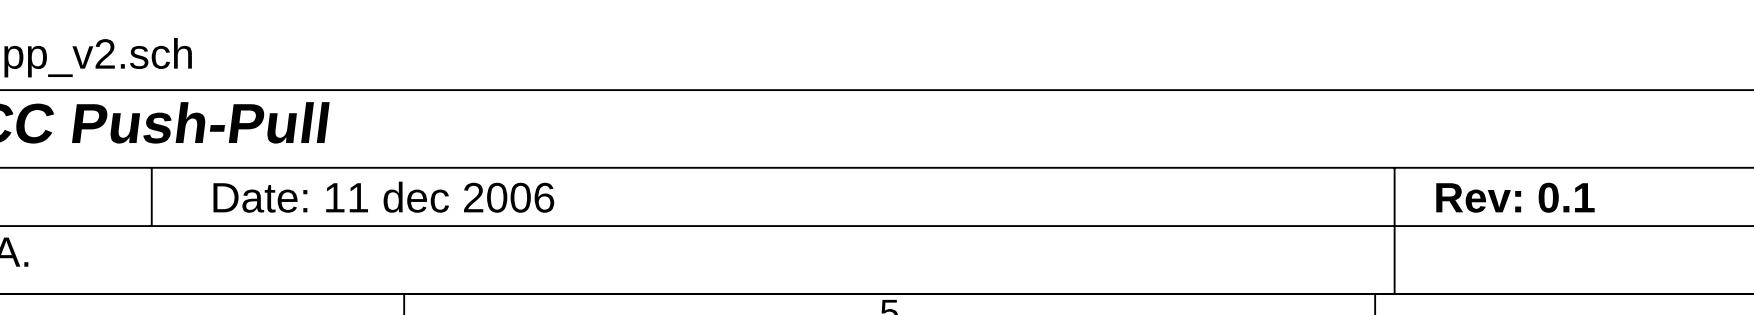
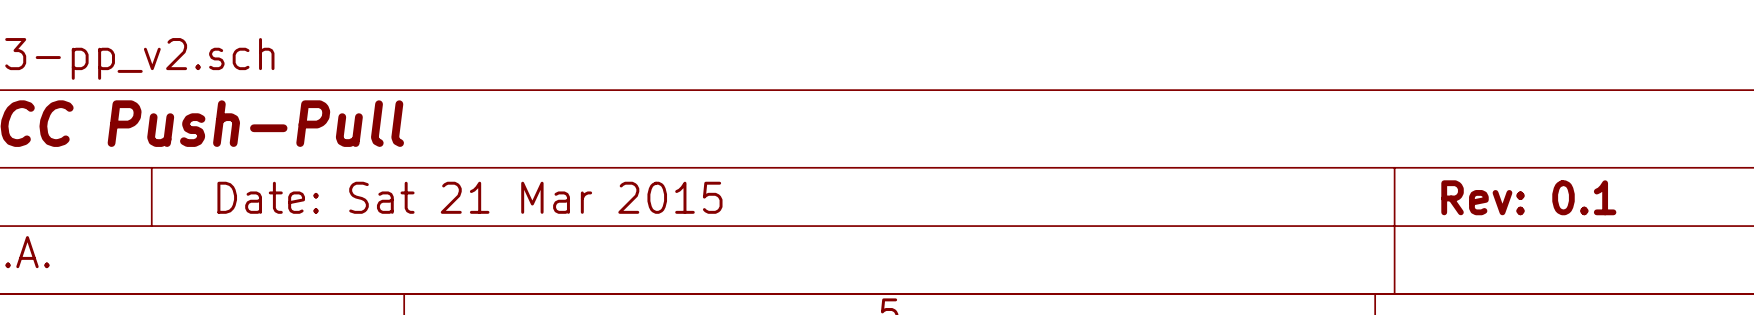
title block: Date: 11 dec 2006 (383, 197) -> Date: Sat 21 Mar 2015 (469, 197)

